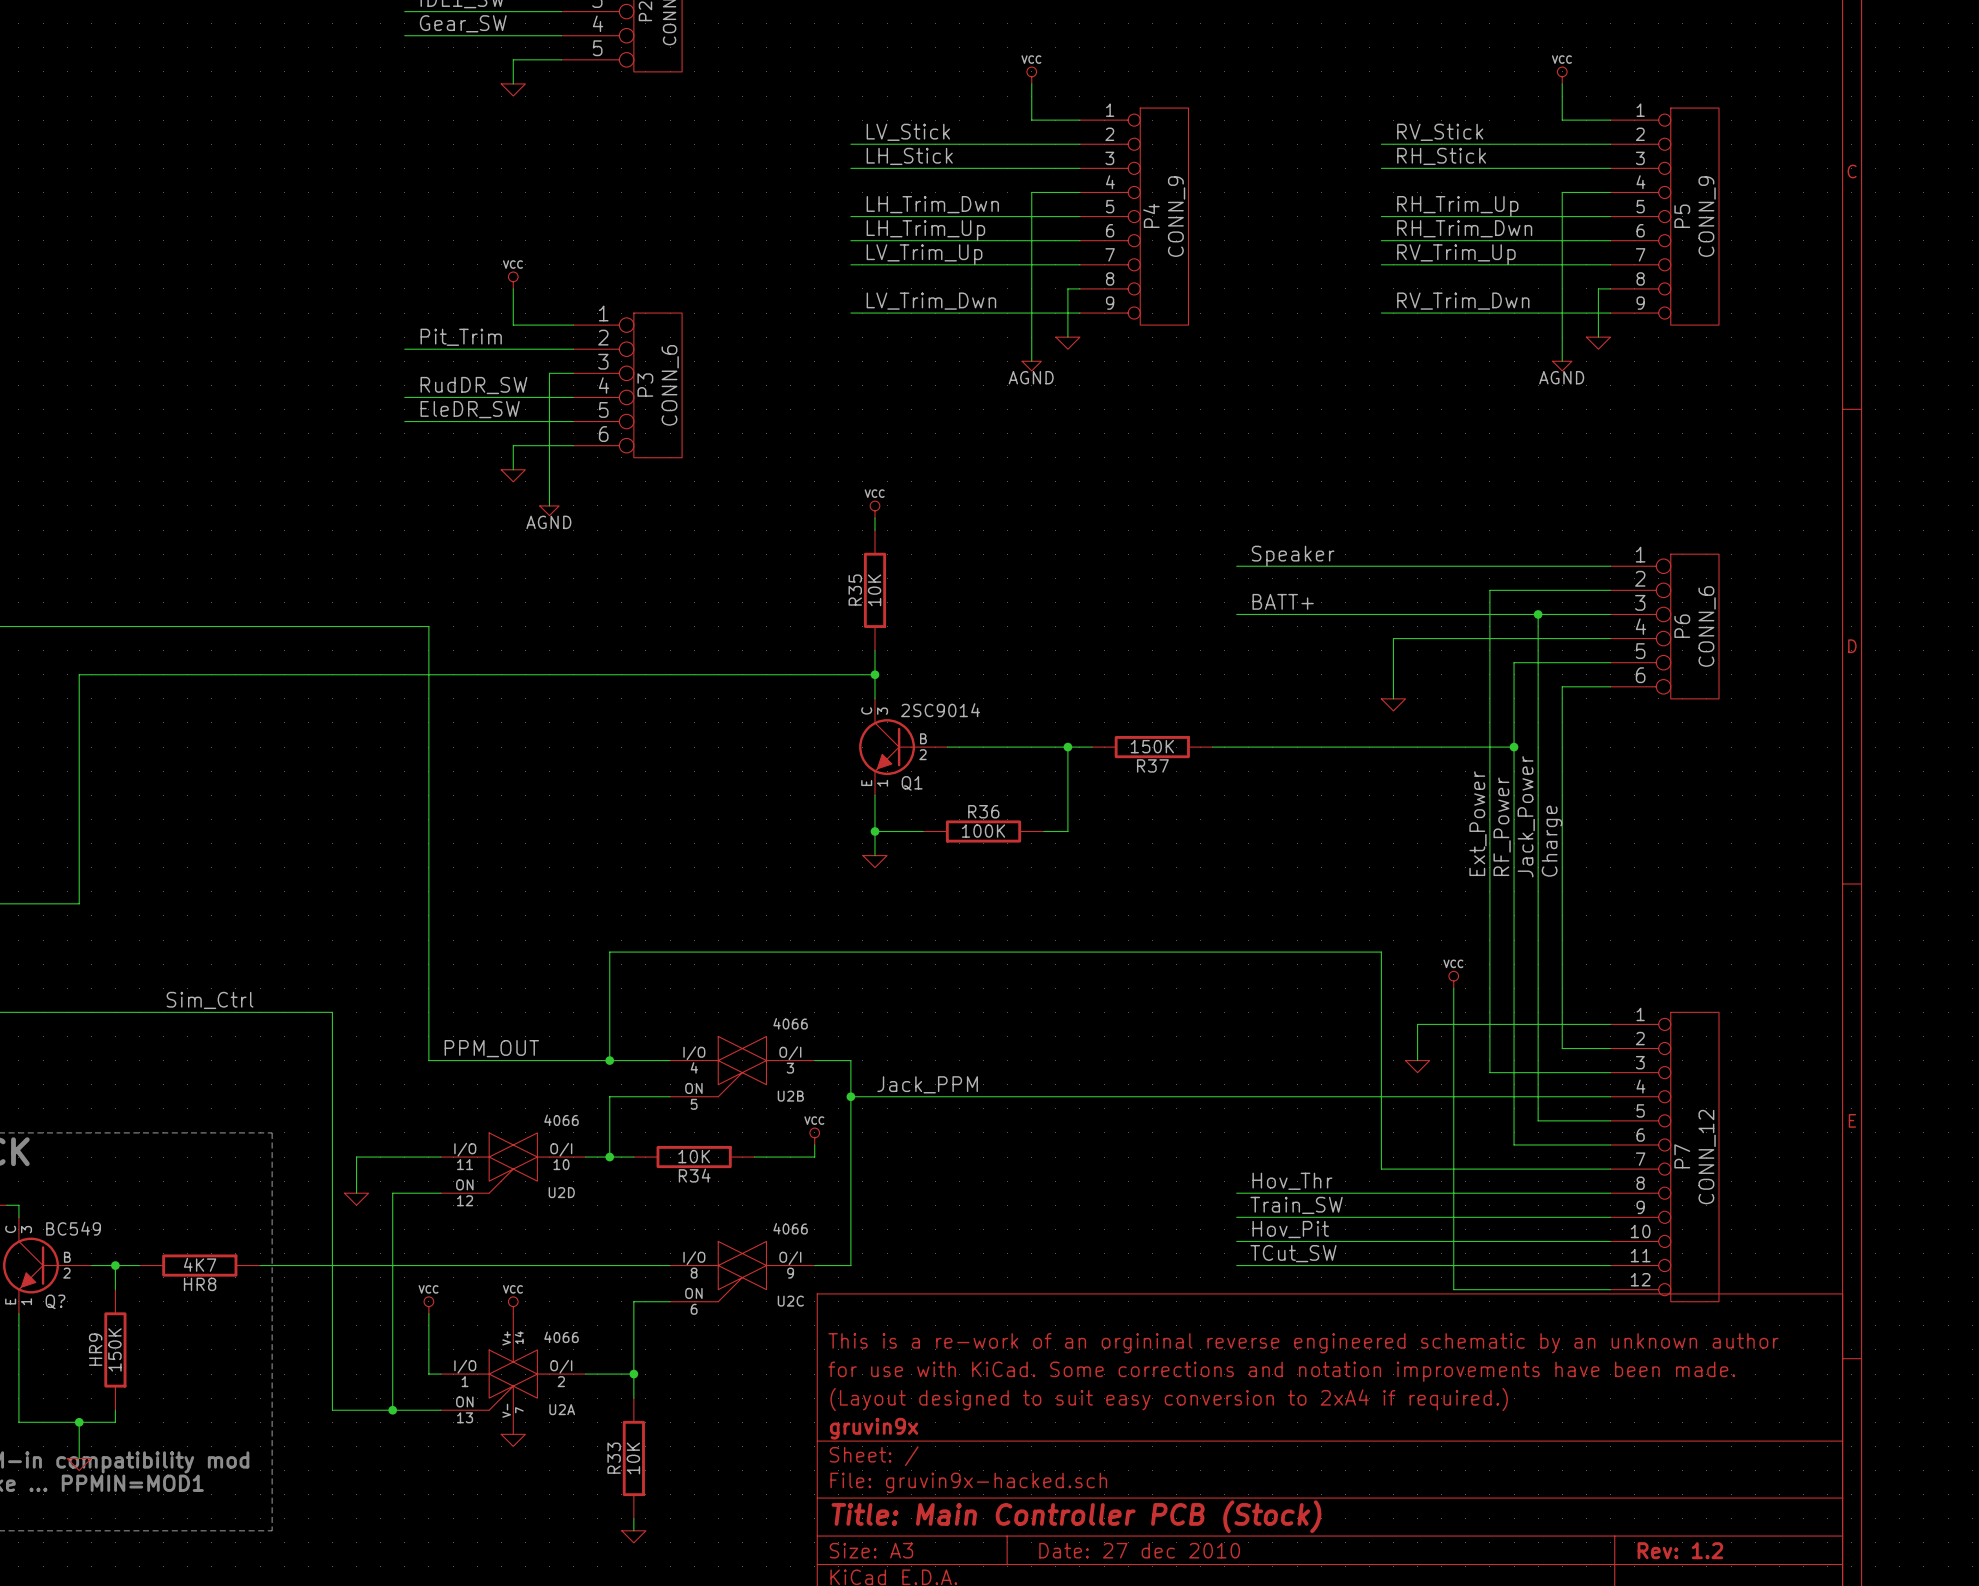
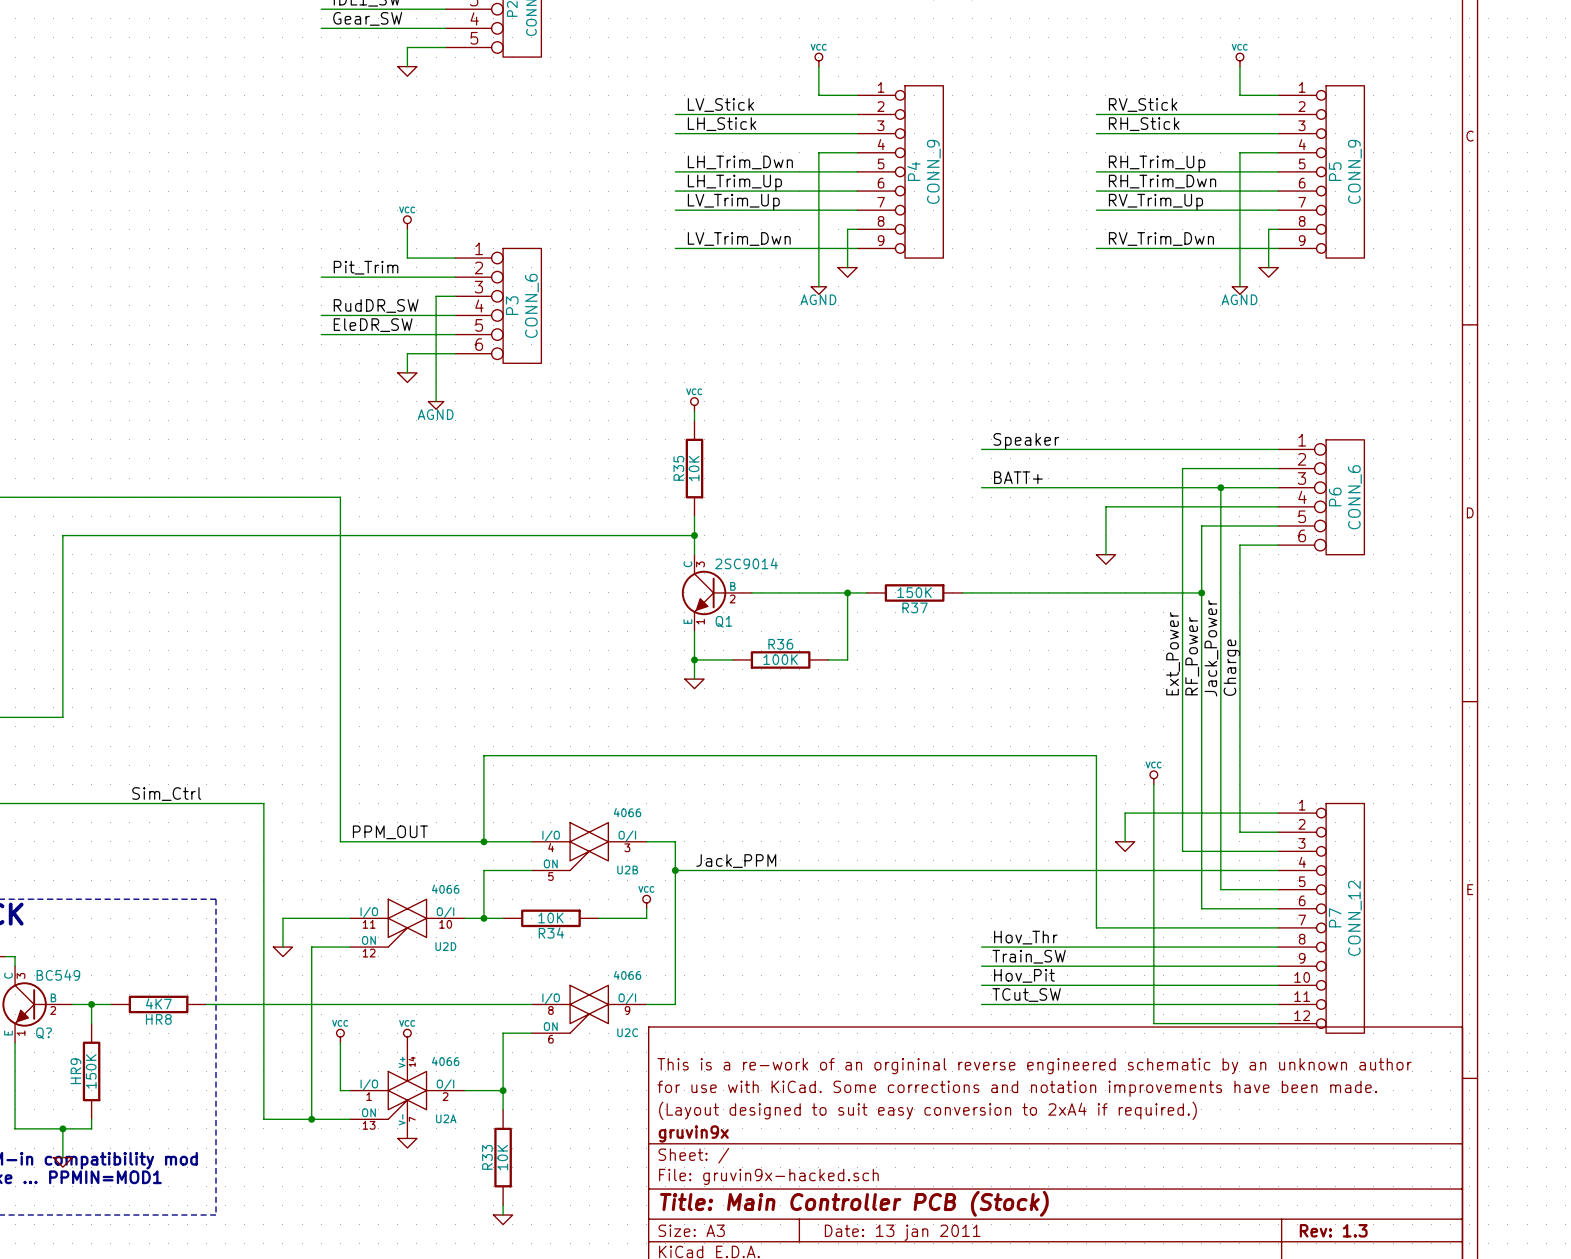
title block: Date: 27 dec 2010 (1139, 1550) -> Date: 13 jan 2011 (902, 1232)
title block: Rev: 1.2 (1680, 1550) -> Rev: 1.3 (1333, 1230)

